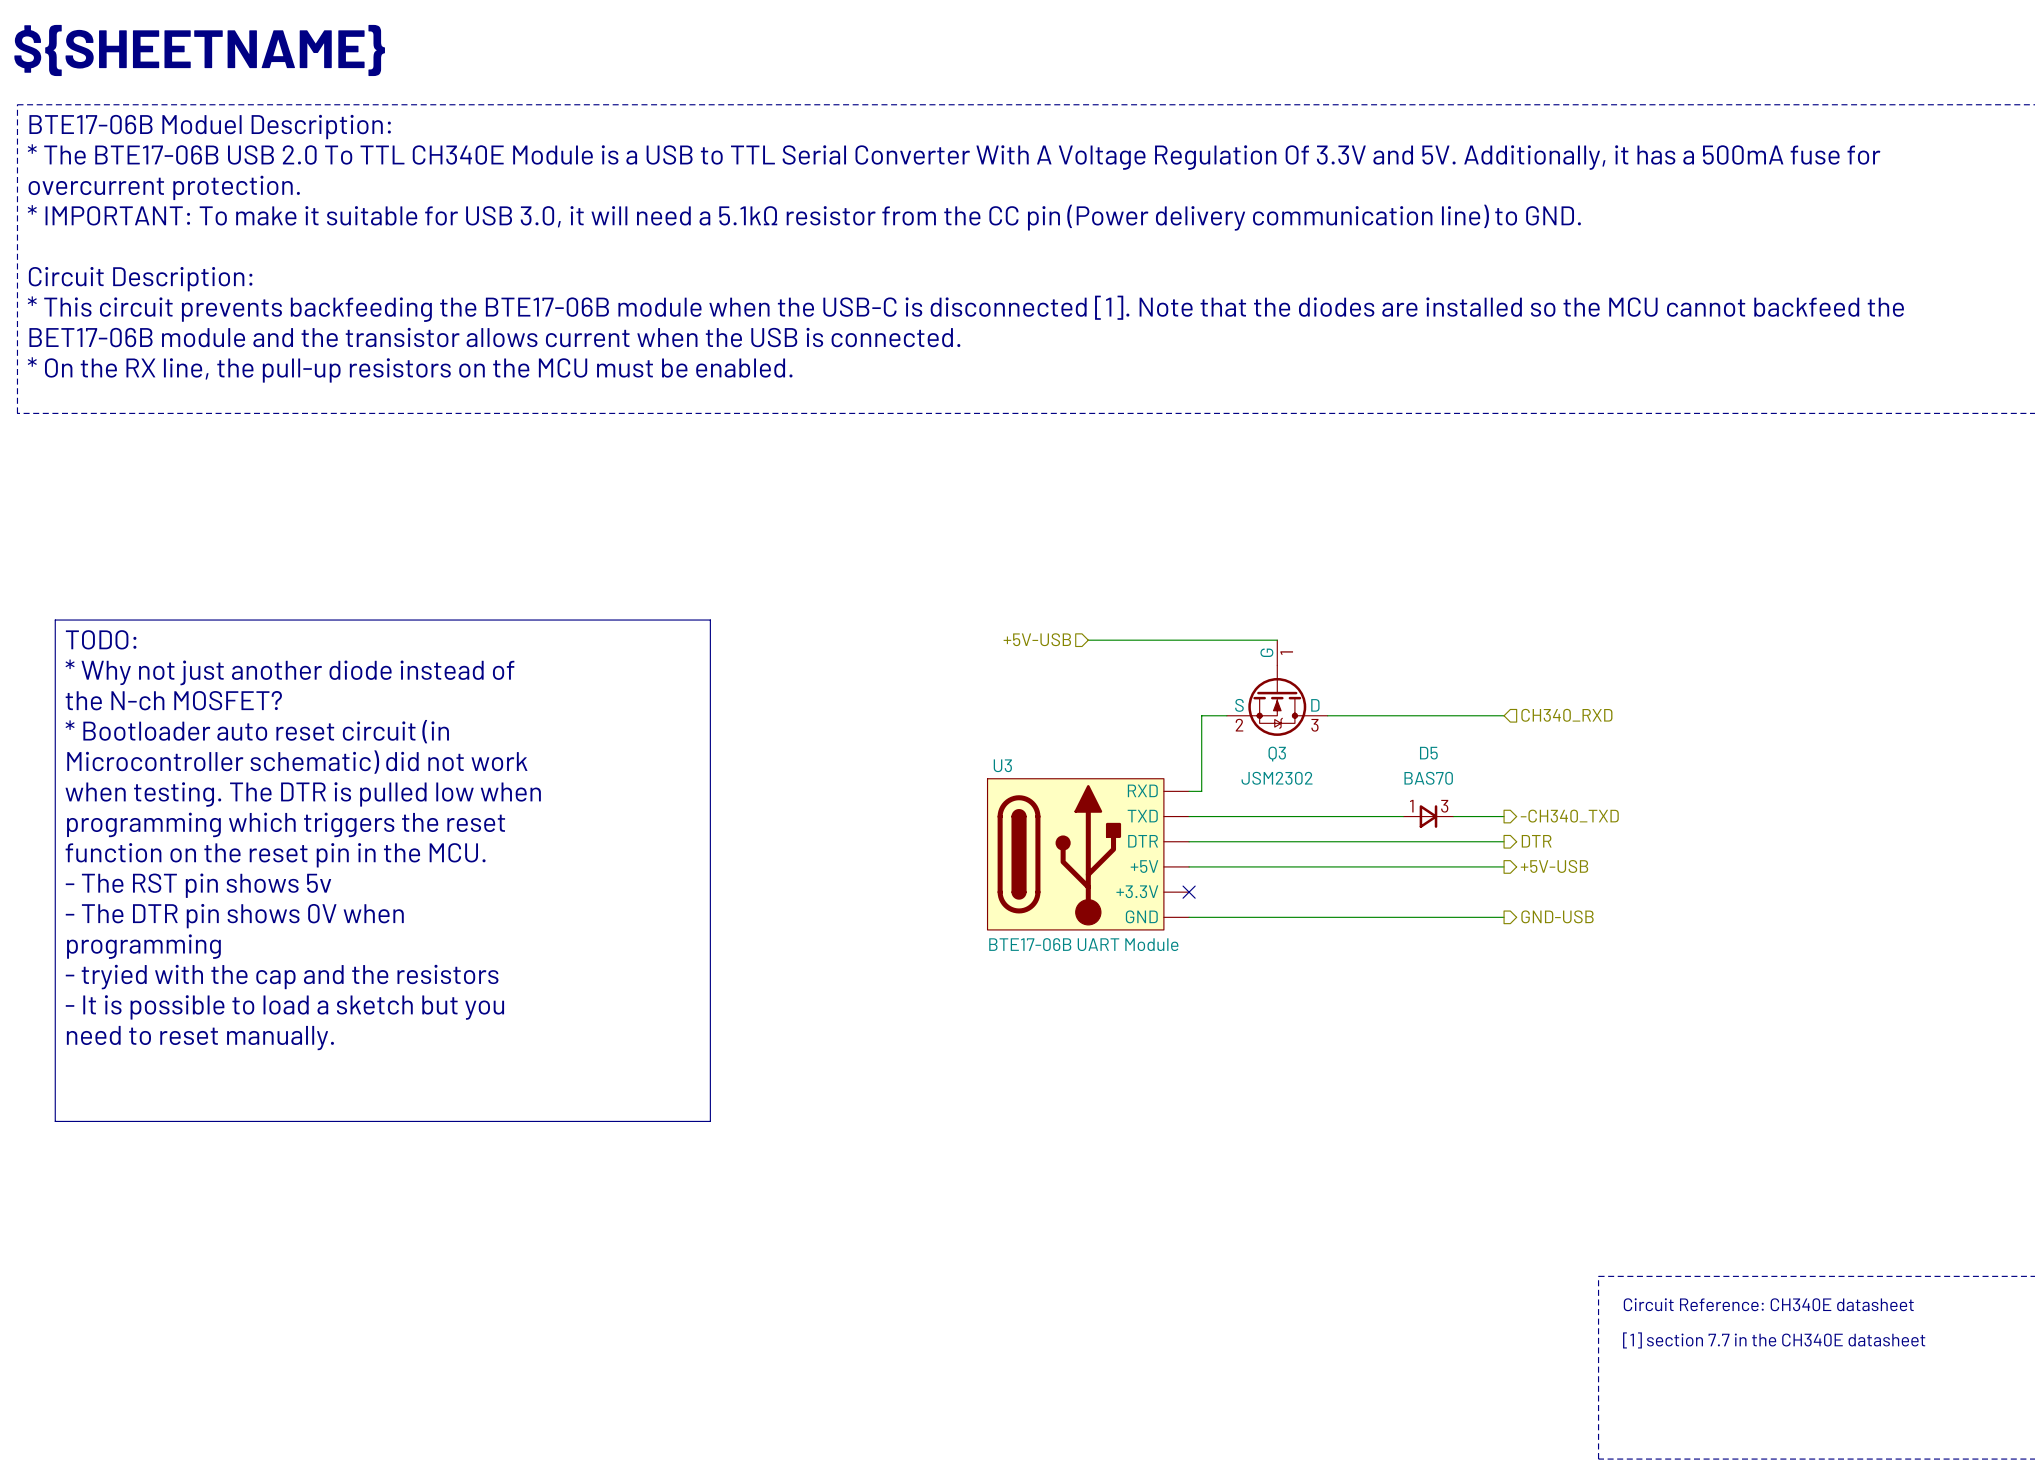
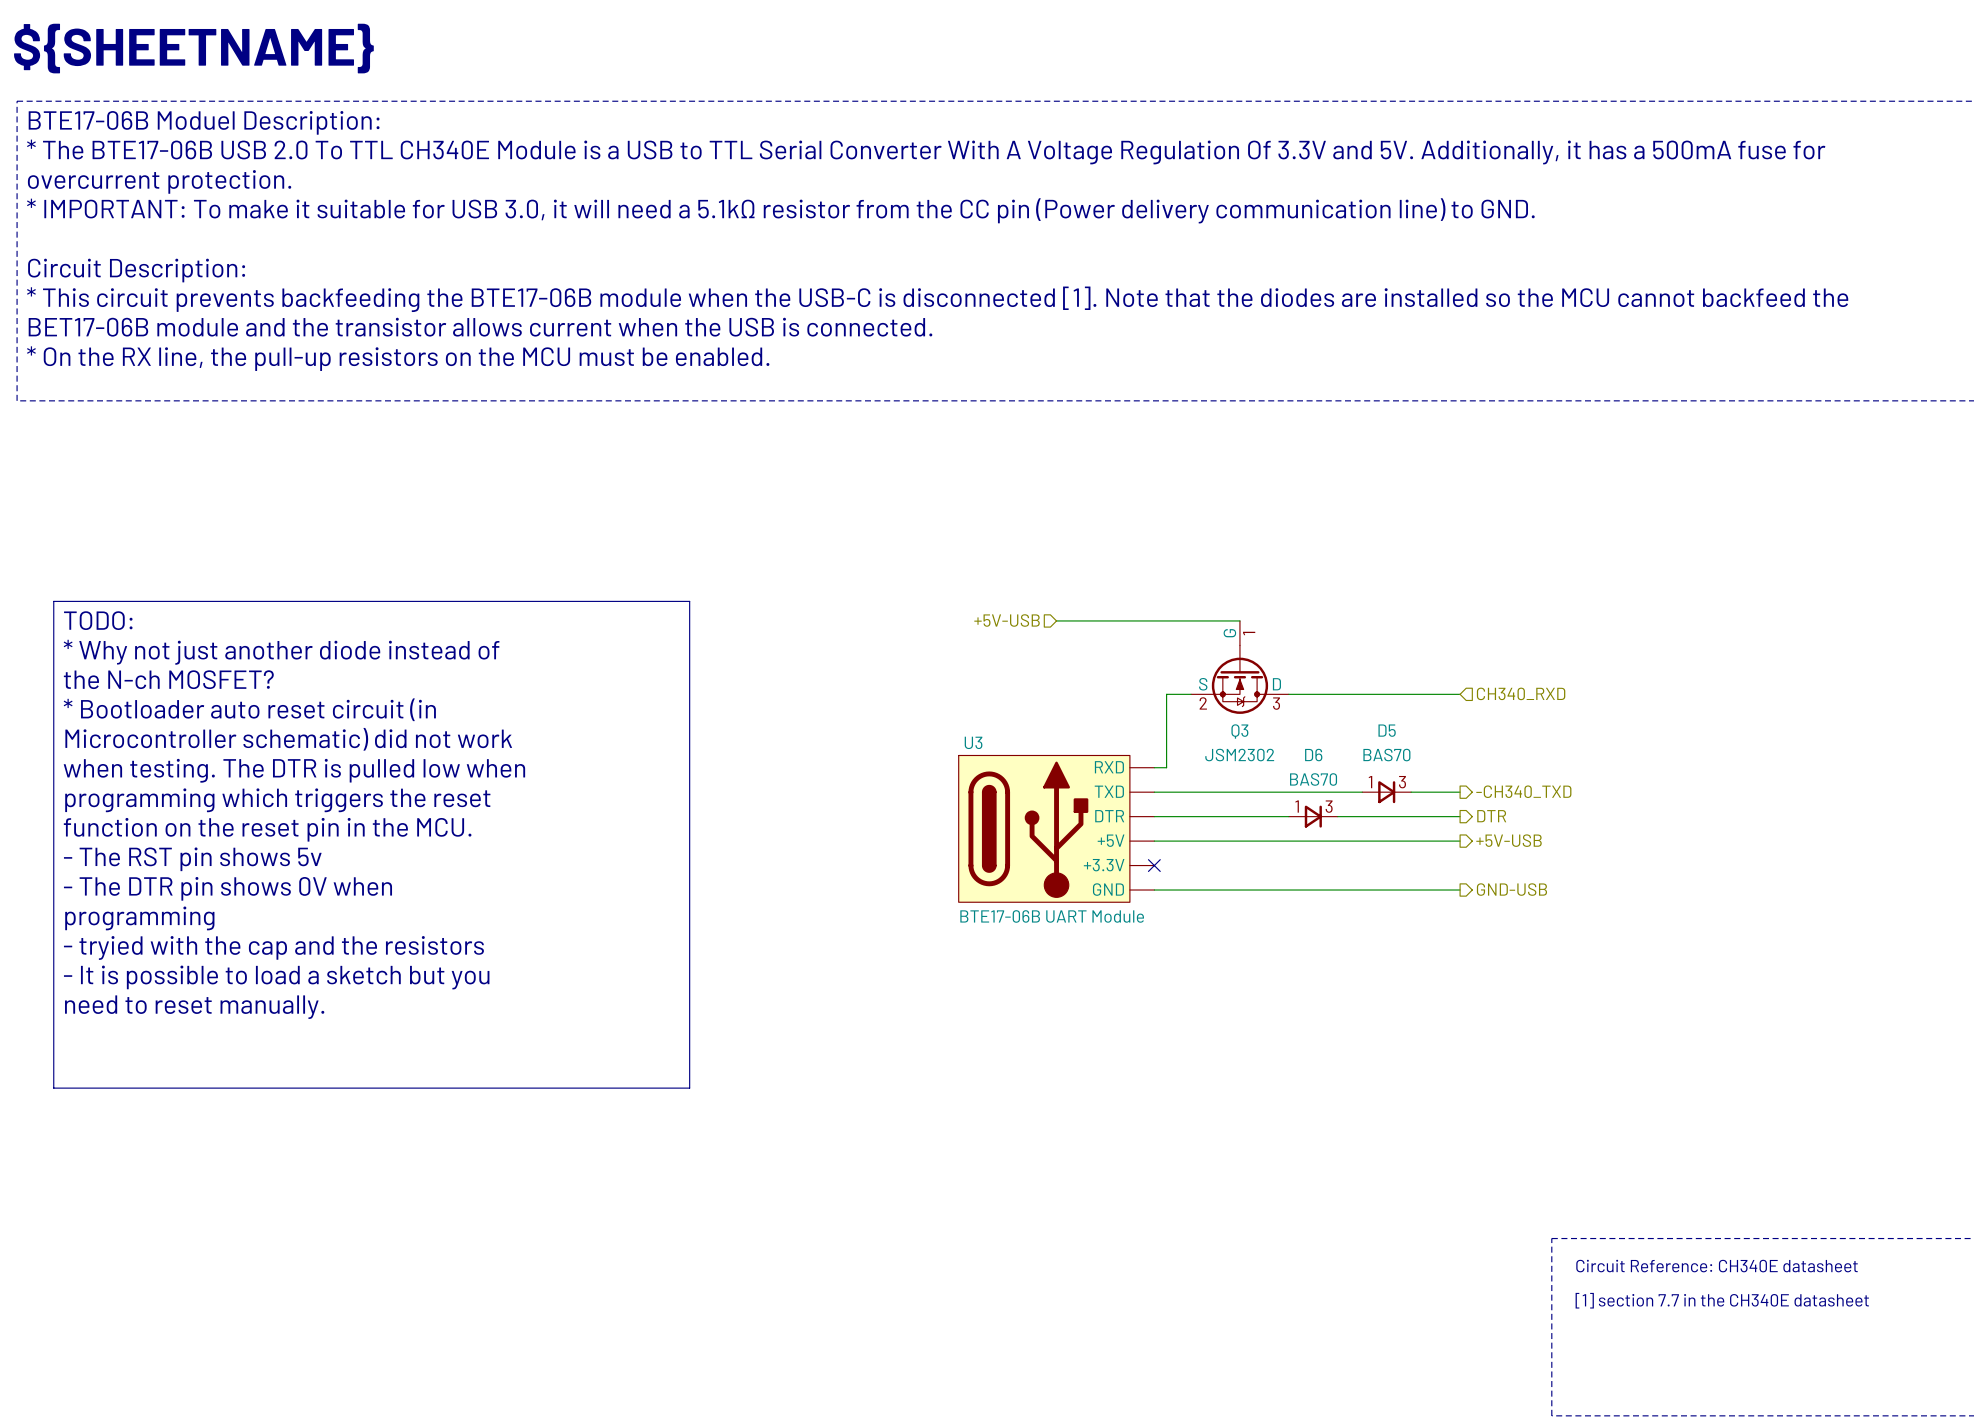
D6: none -> BAS70 (1313, 816)

